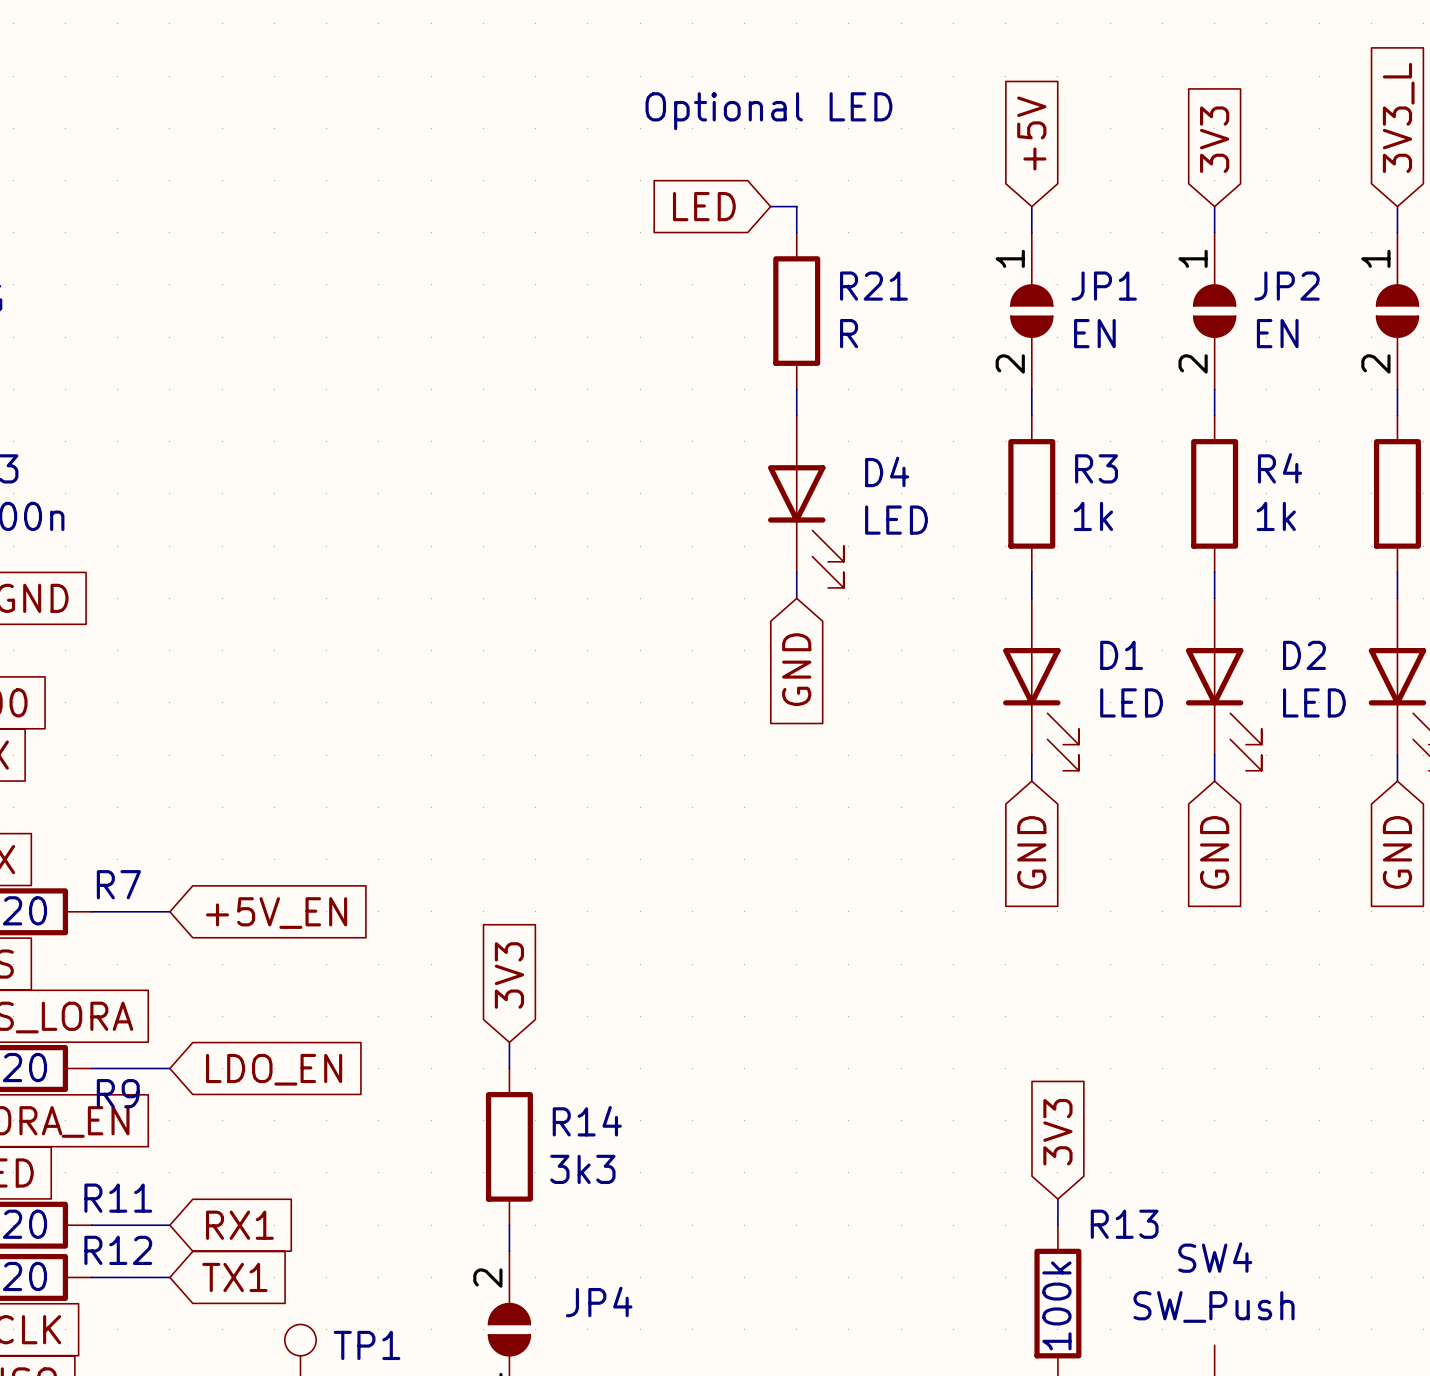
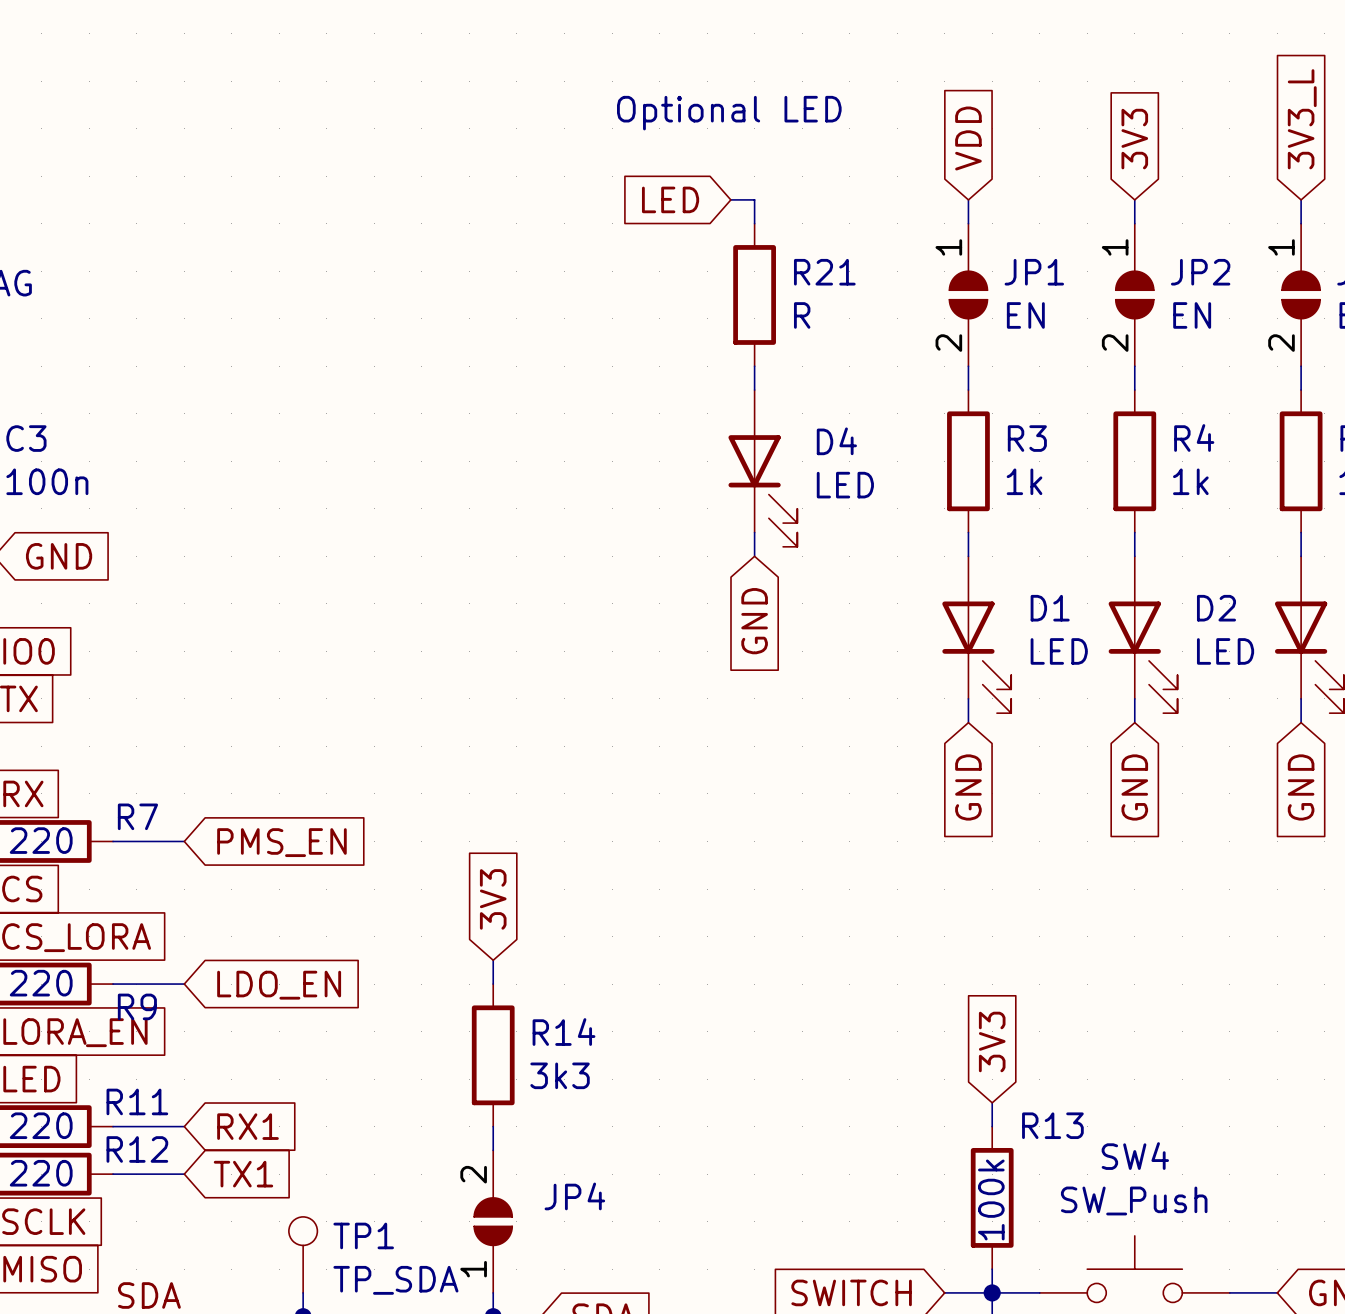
global label: +5V (1031, 133) -> VDD (968, 138)
global label: +5V_EN (276, 913) -> PMS_EN (281, 842)

